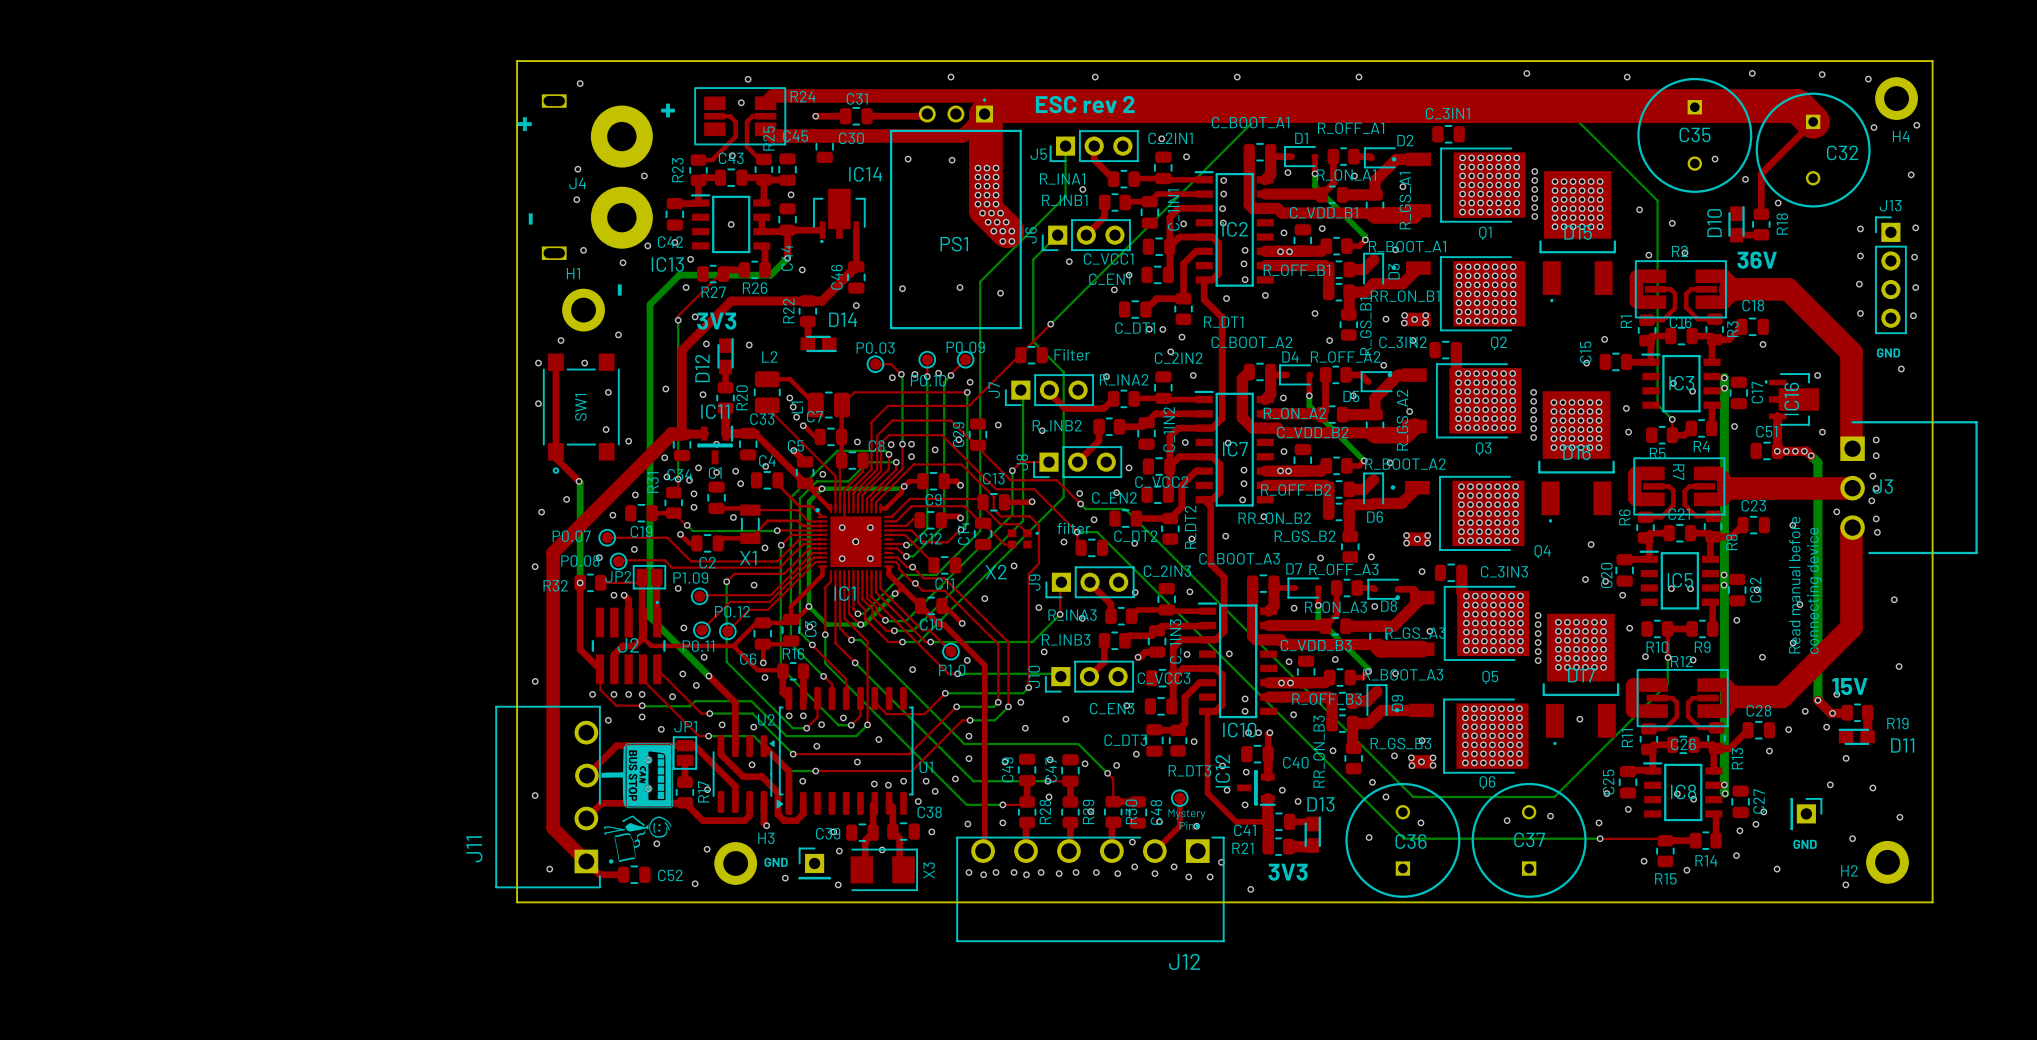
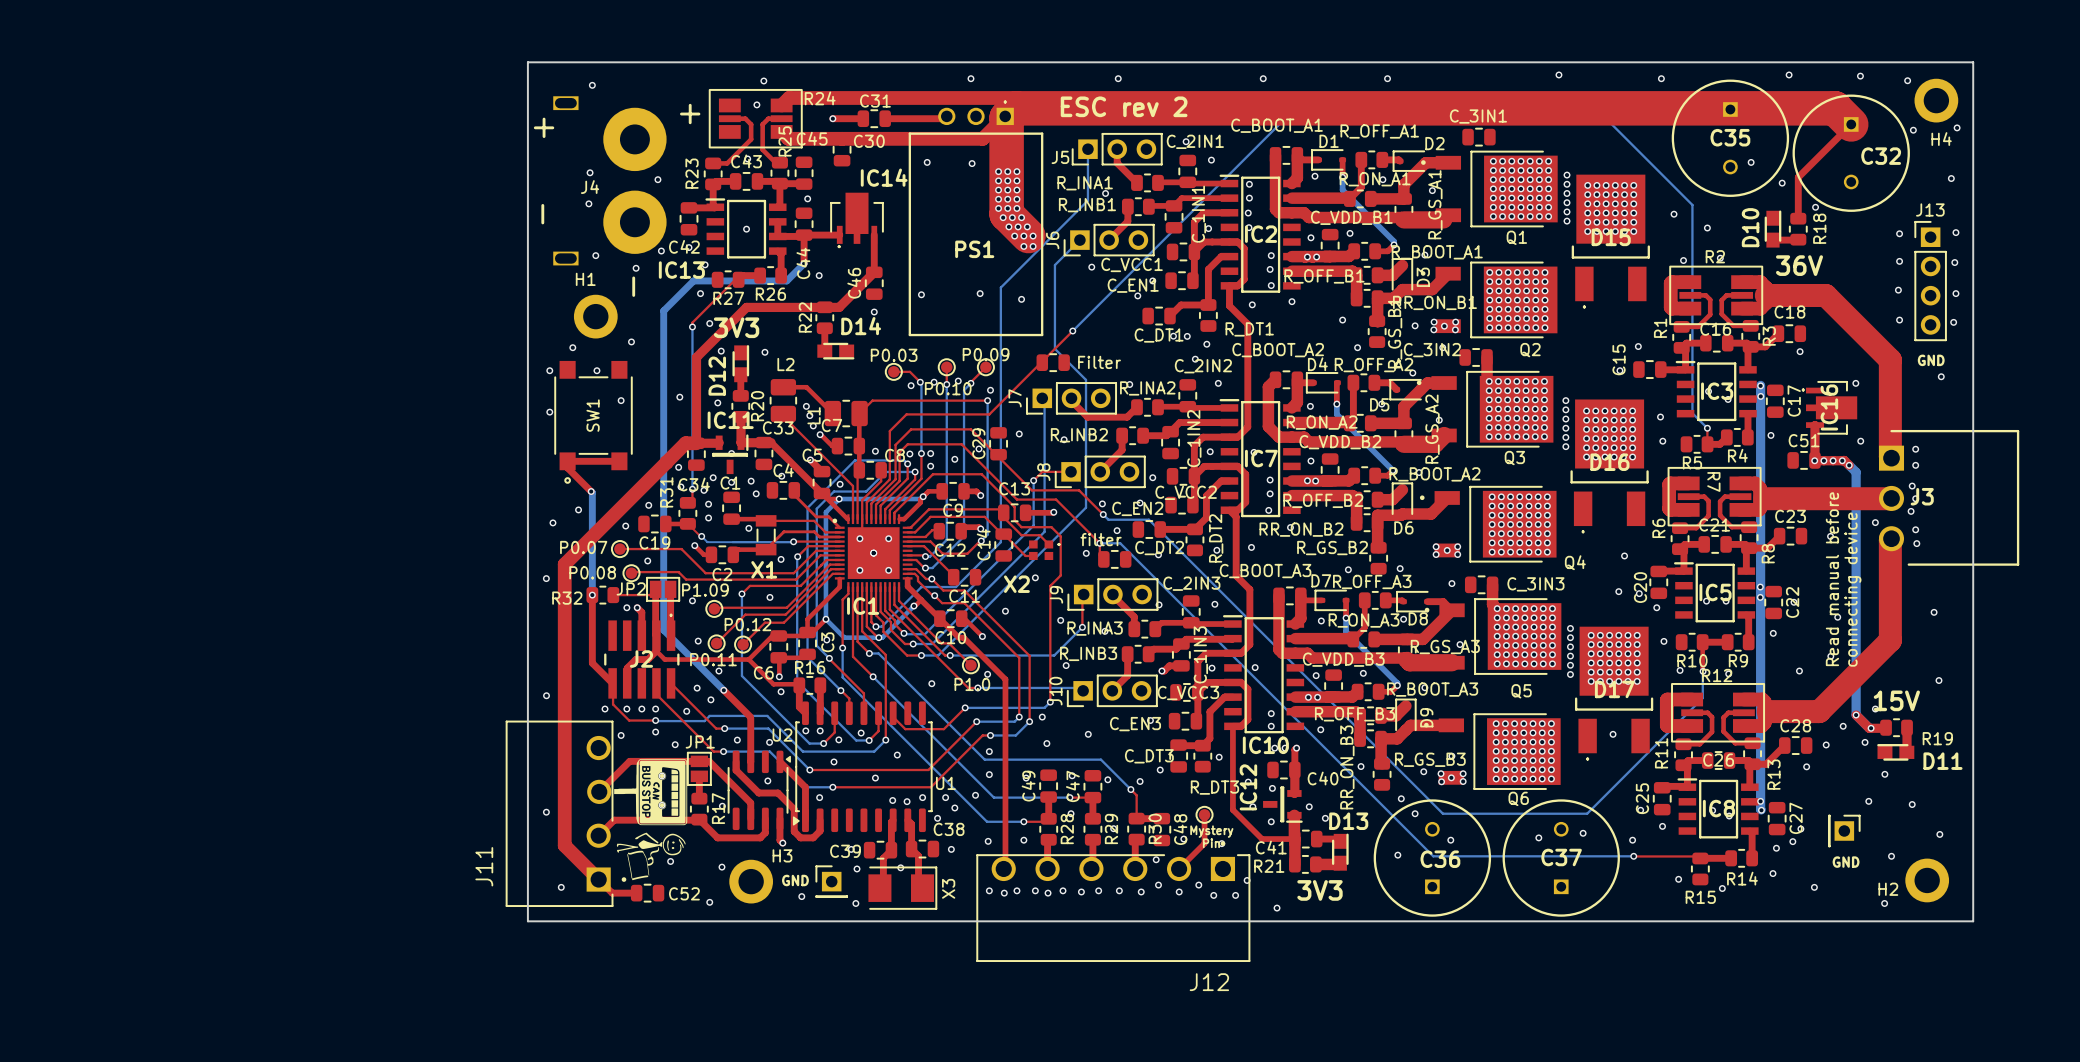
top track: (555, 362) (555, 451) -> (619, 461) (567, 461)
via: (606, 429) -> none
via: (628, 441) -> none

